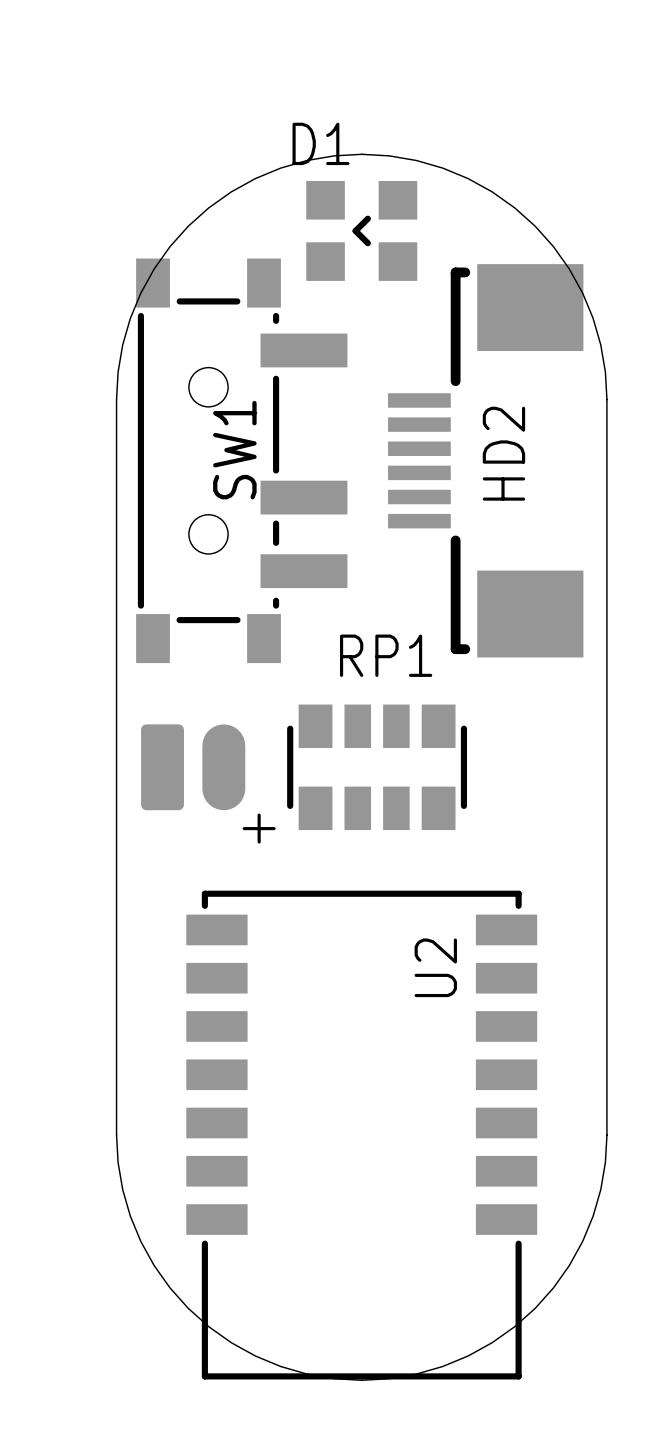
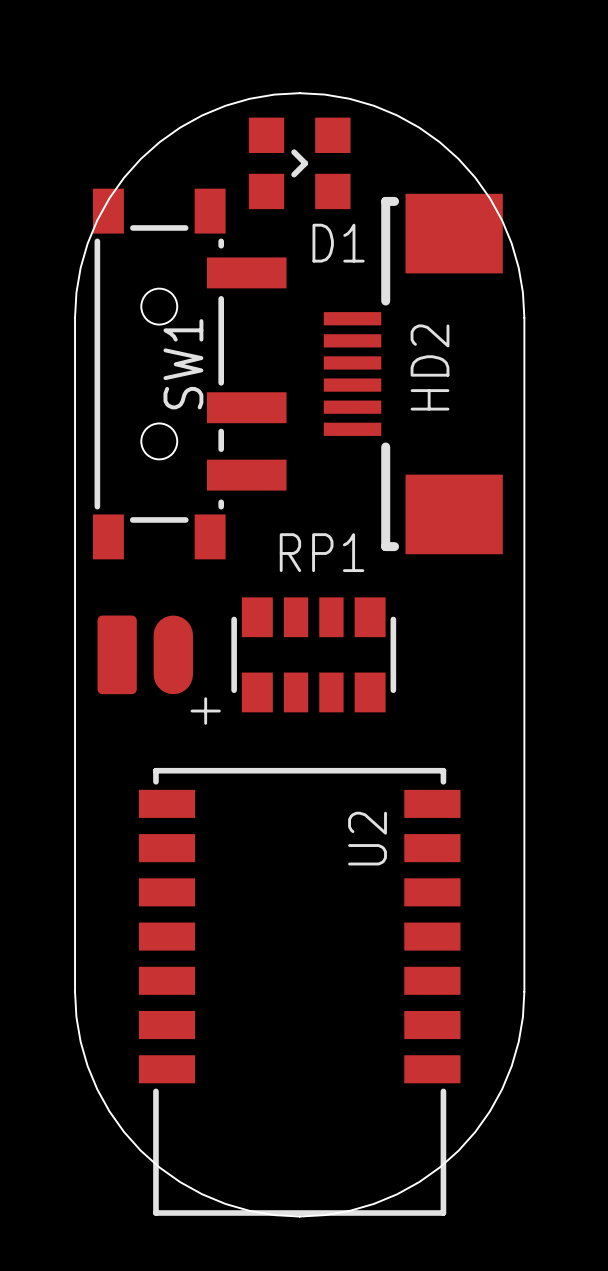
D1 rotation: 0° (361, 230) -> 180° (299, 163)

